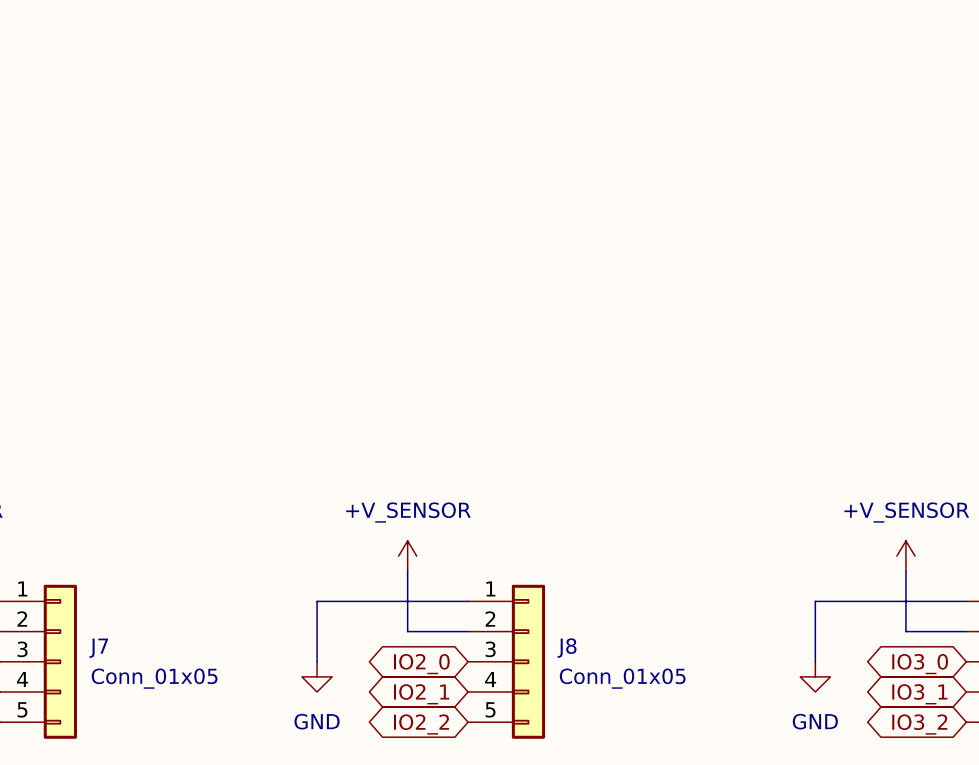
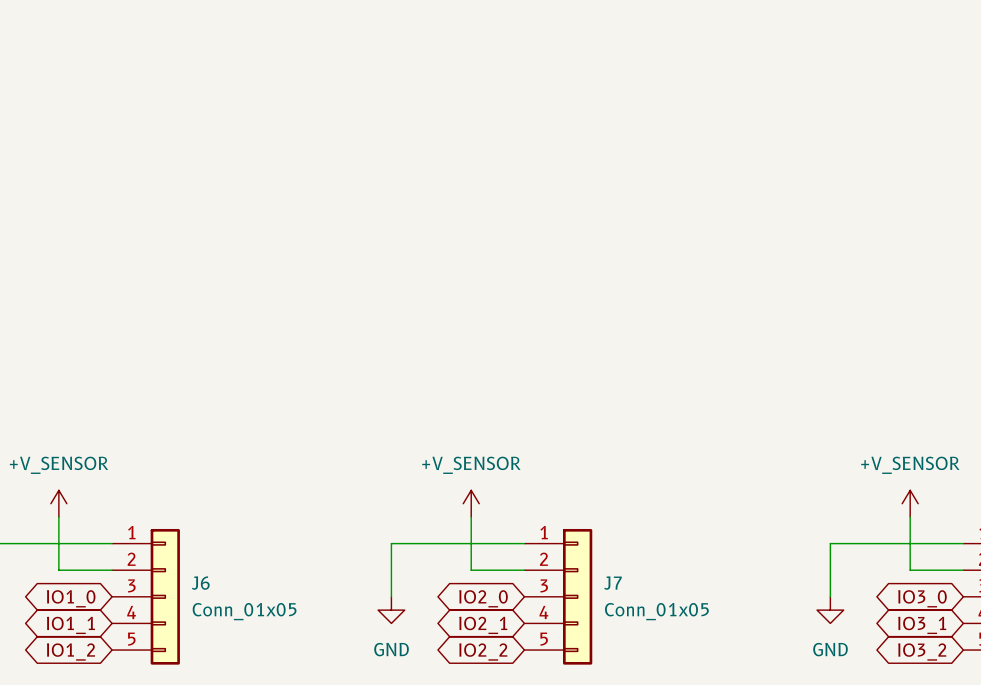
J7 name: J7 (98, 648) -> J6 (200, 583)
J8 name: J8 (567, 648) -> J7 (612, 583)

